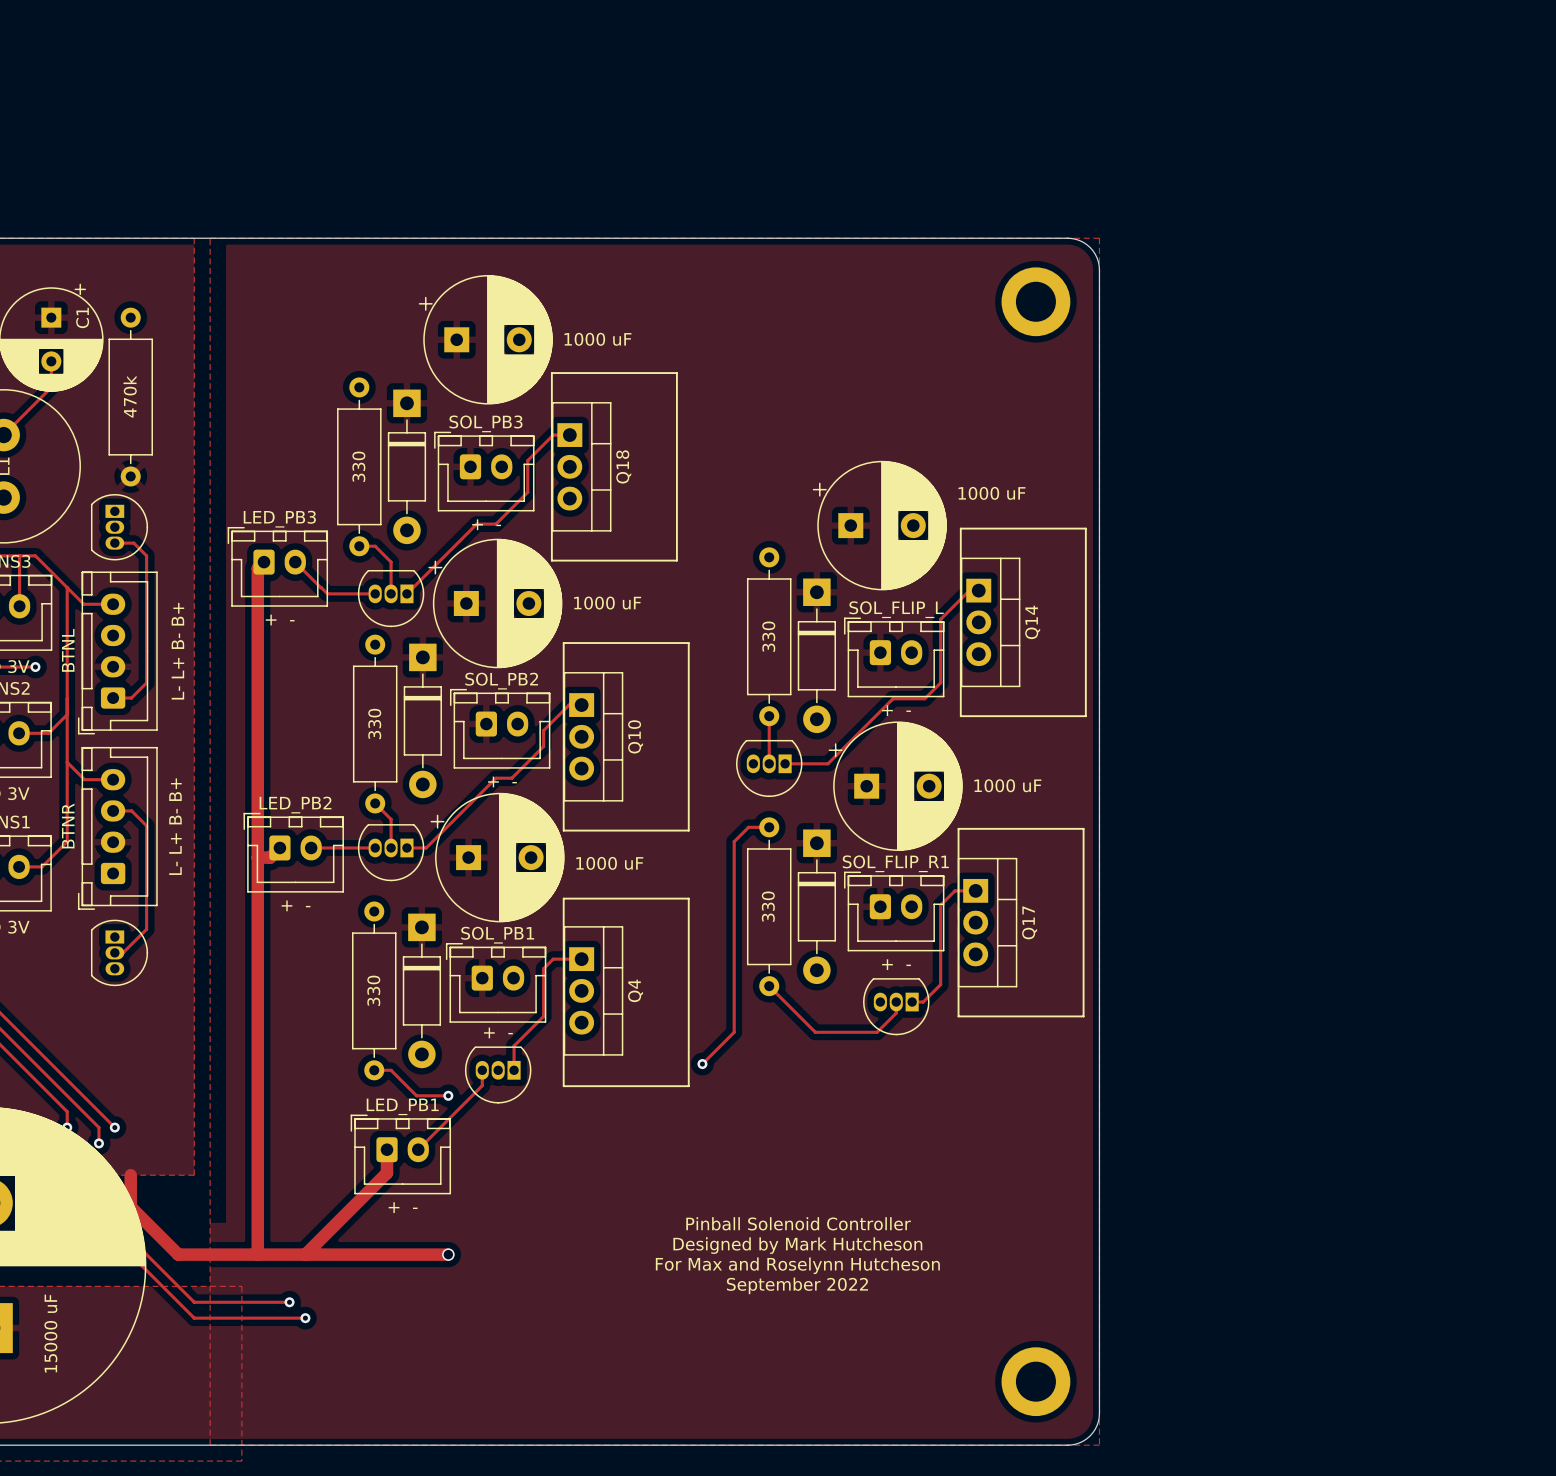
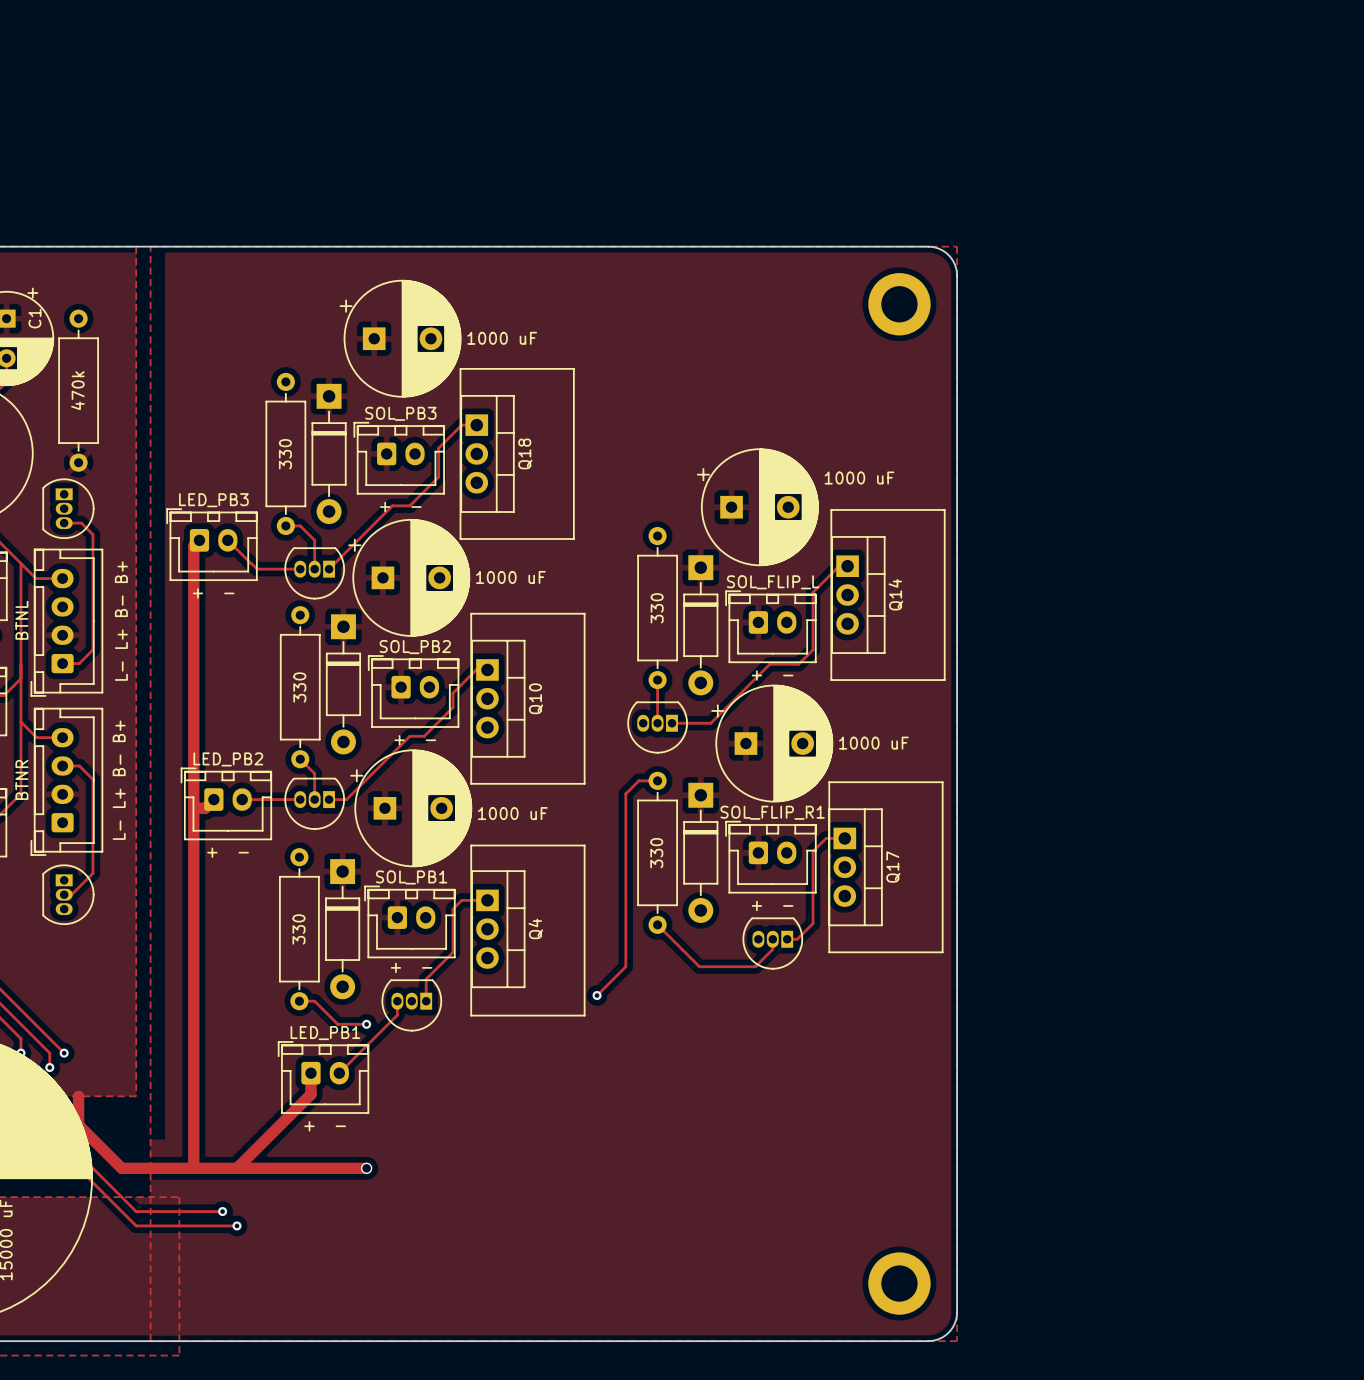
text: Pinball Solenoid Controller (798, 1223) -> none
text: Designed by Mark Hutcheson (797, 1245) -> none
text: For Max and Roselynn Hutcheson (797, 1265) -> none
text: September 2022 (797, 1285) -> none

